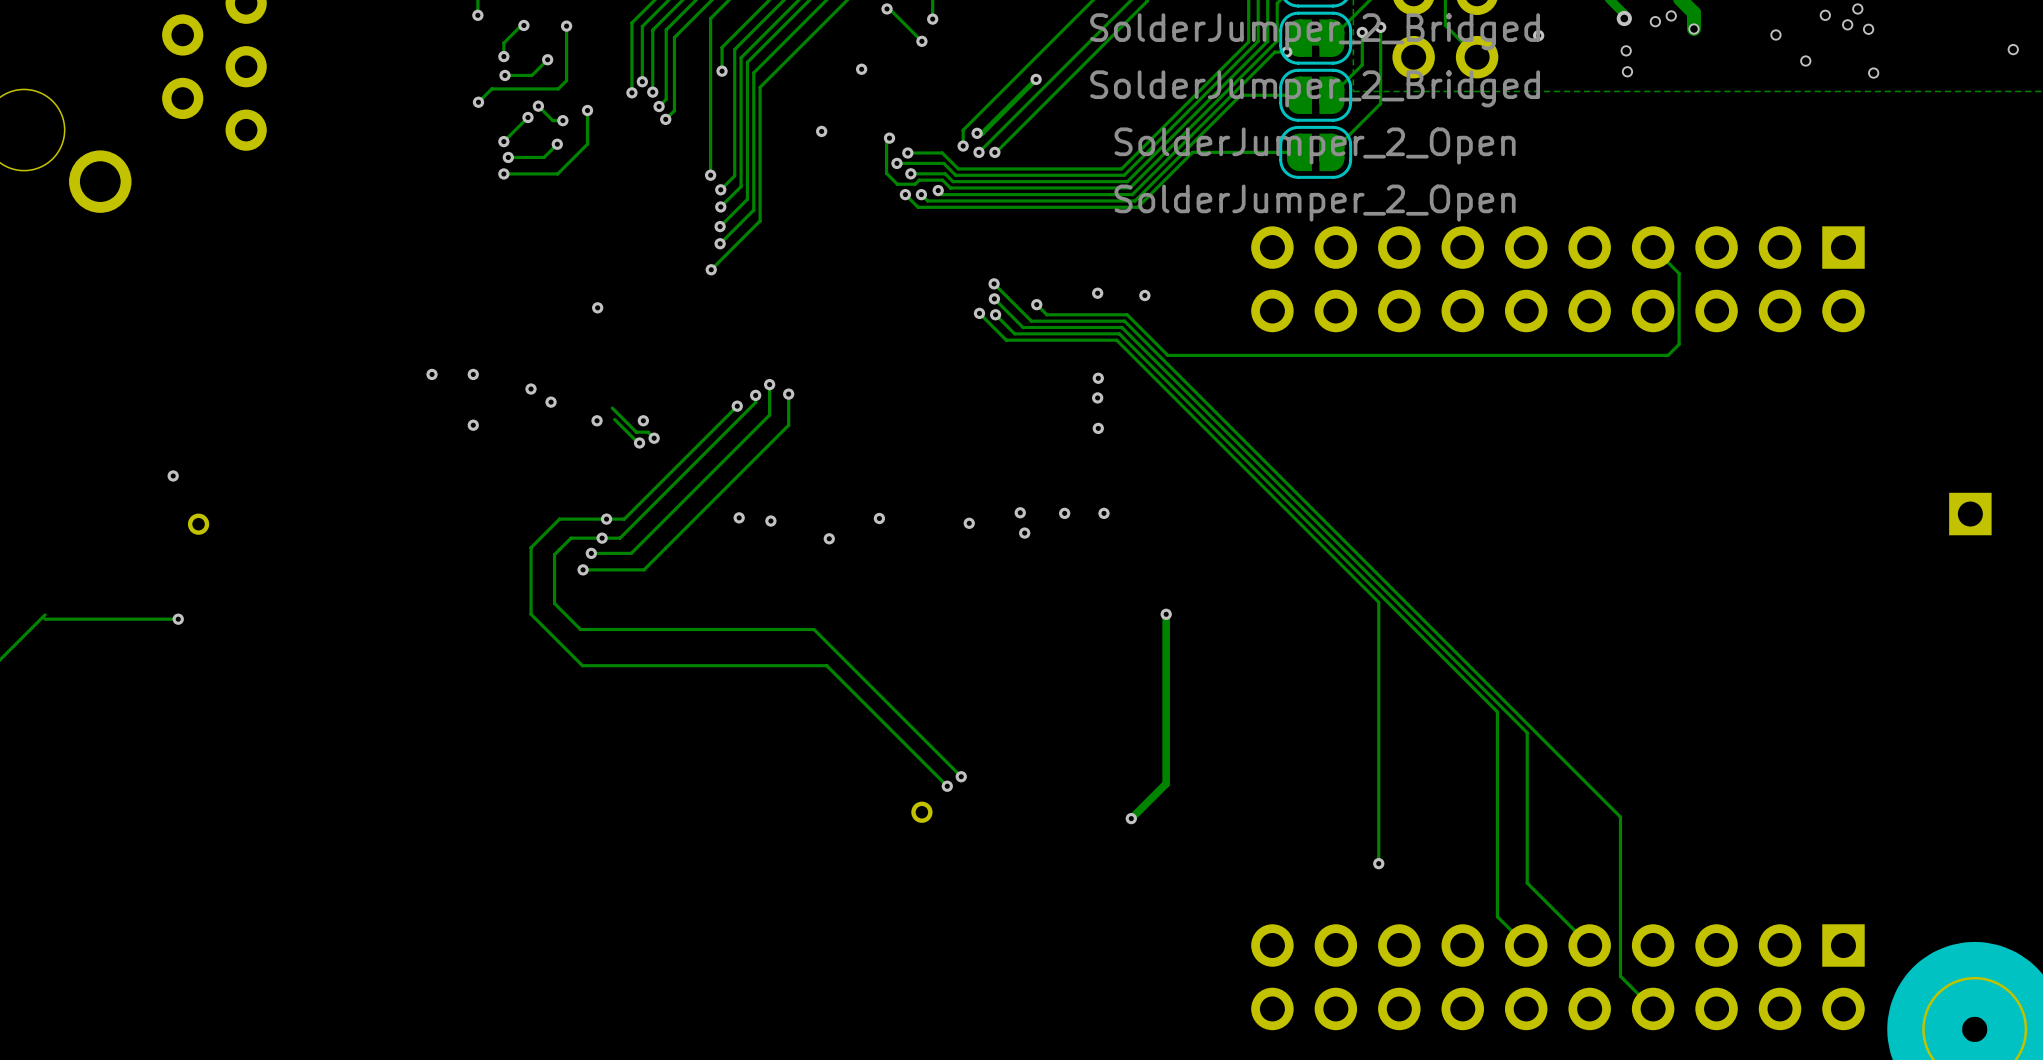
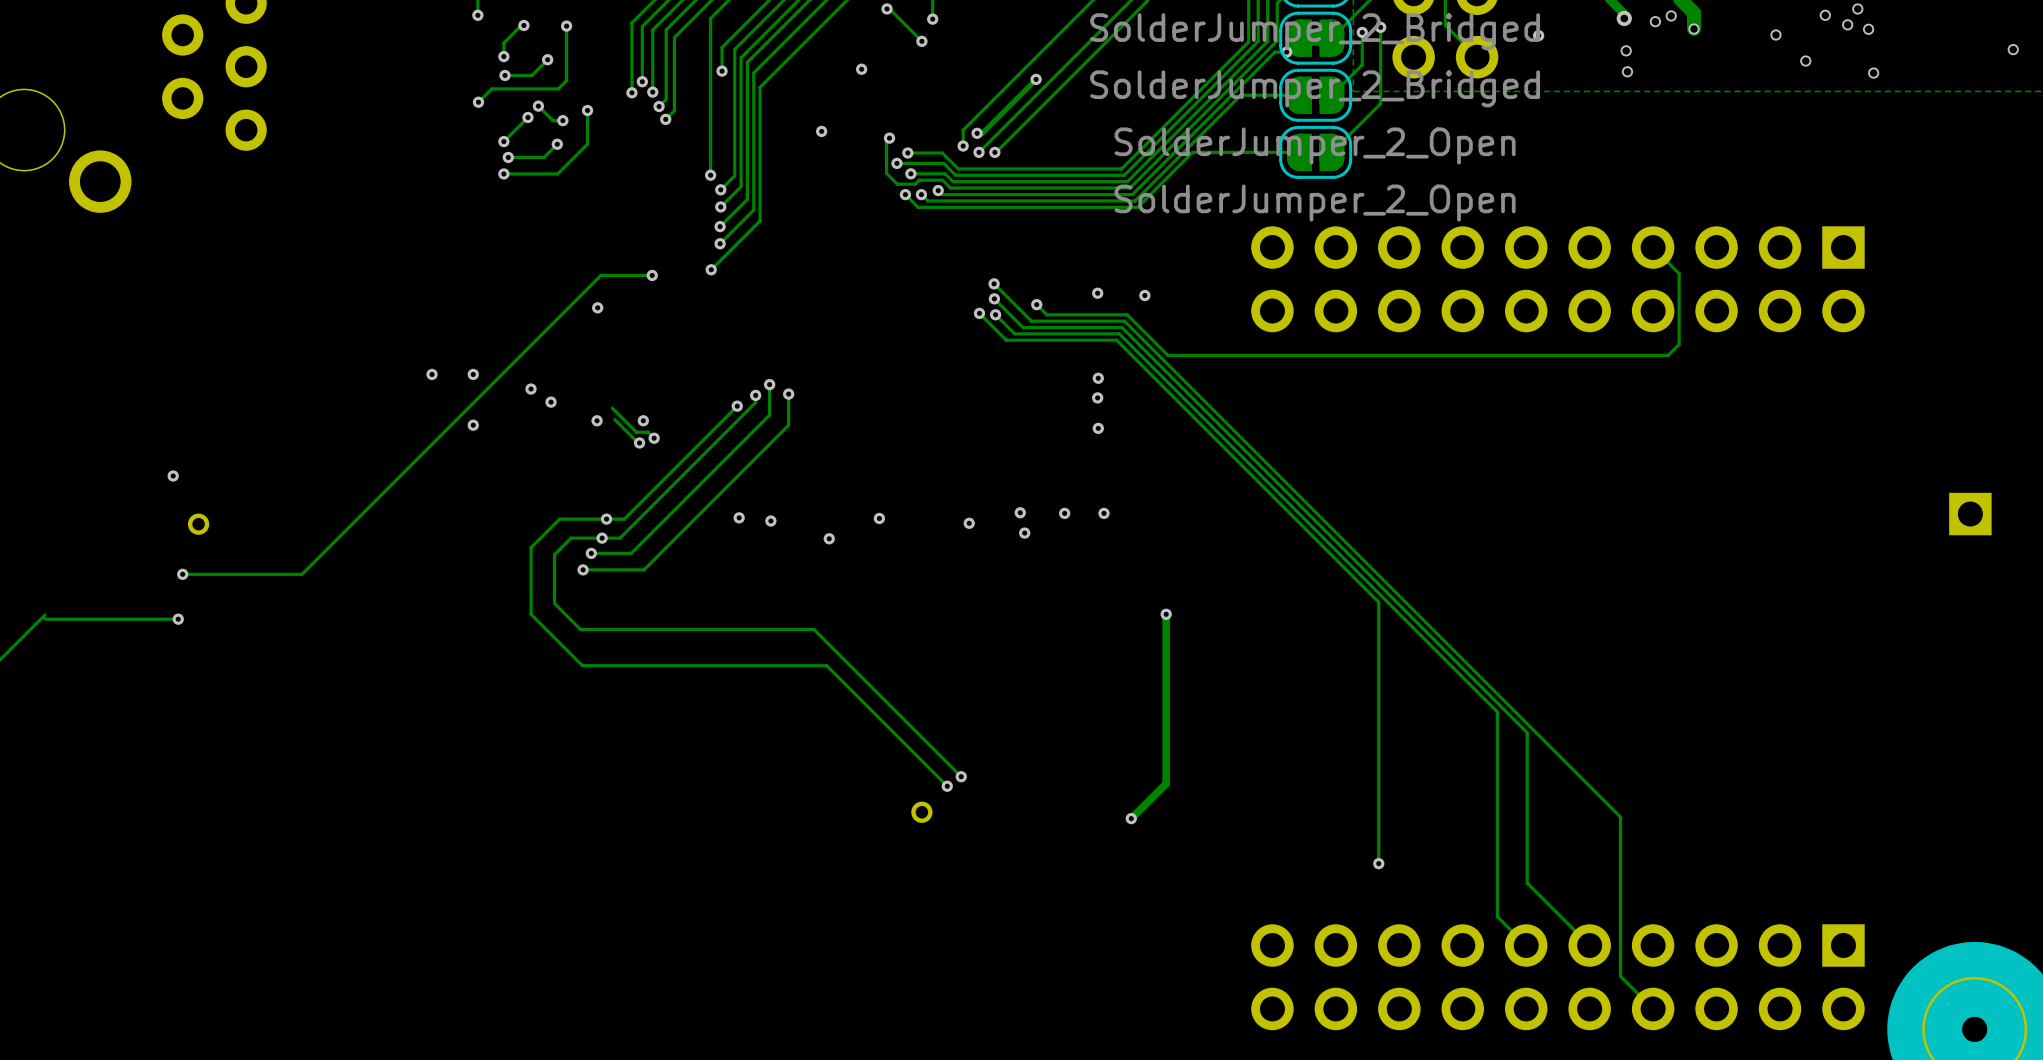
track: none -> (652, 275) (600, 275) (301, 574) (182, 574)
via: none -> (652, 275)
via: none -> (182, 574)

